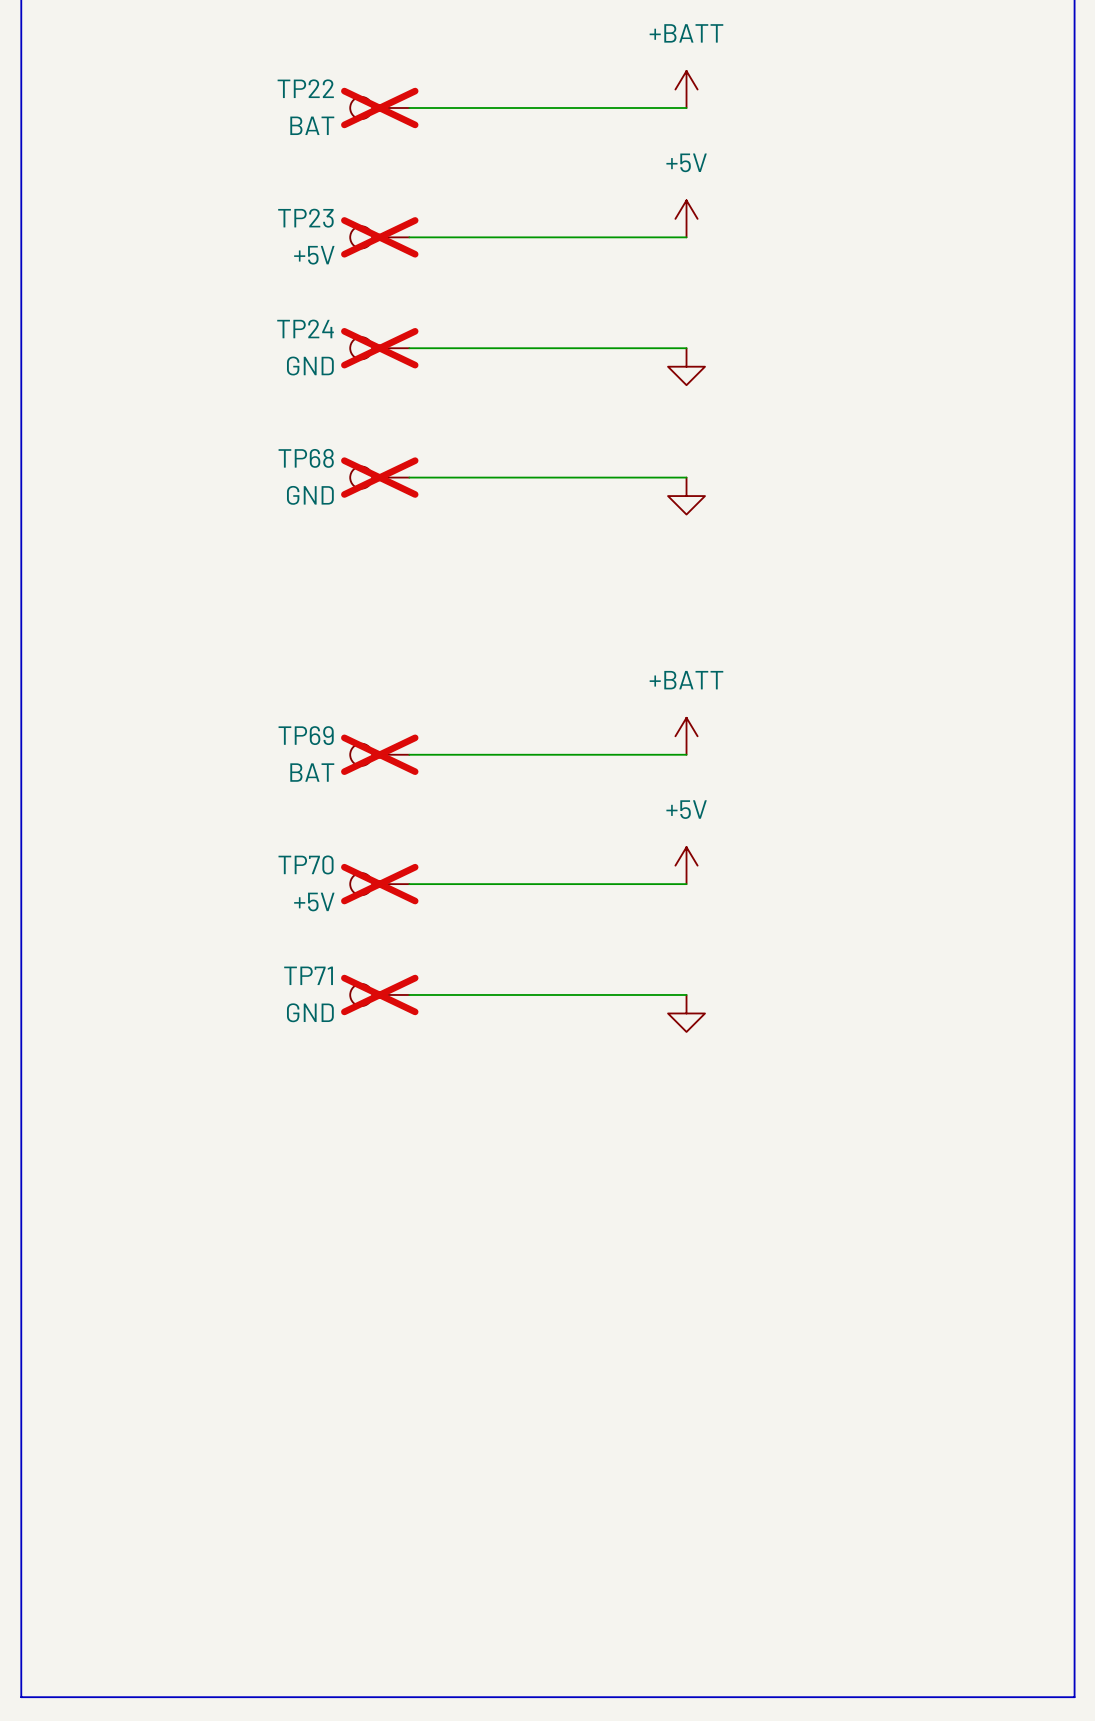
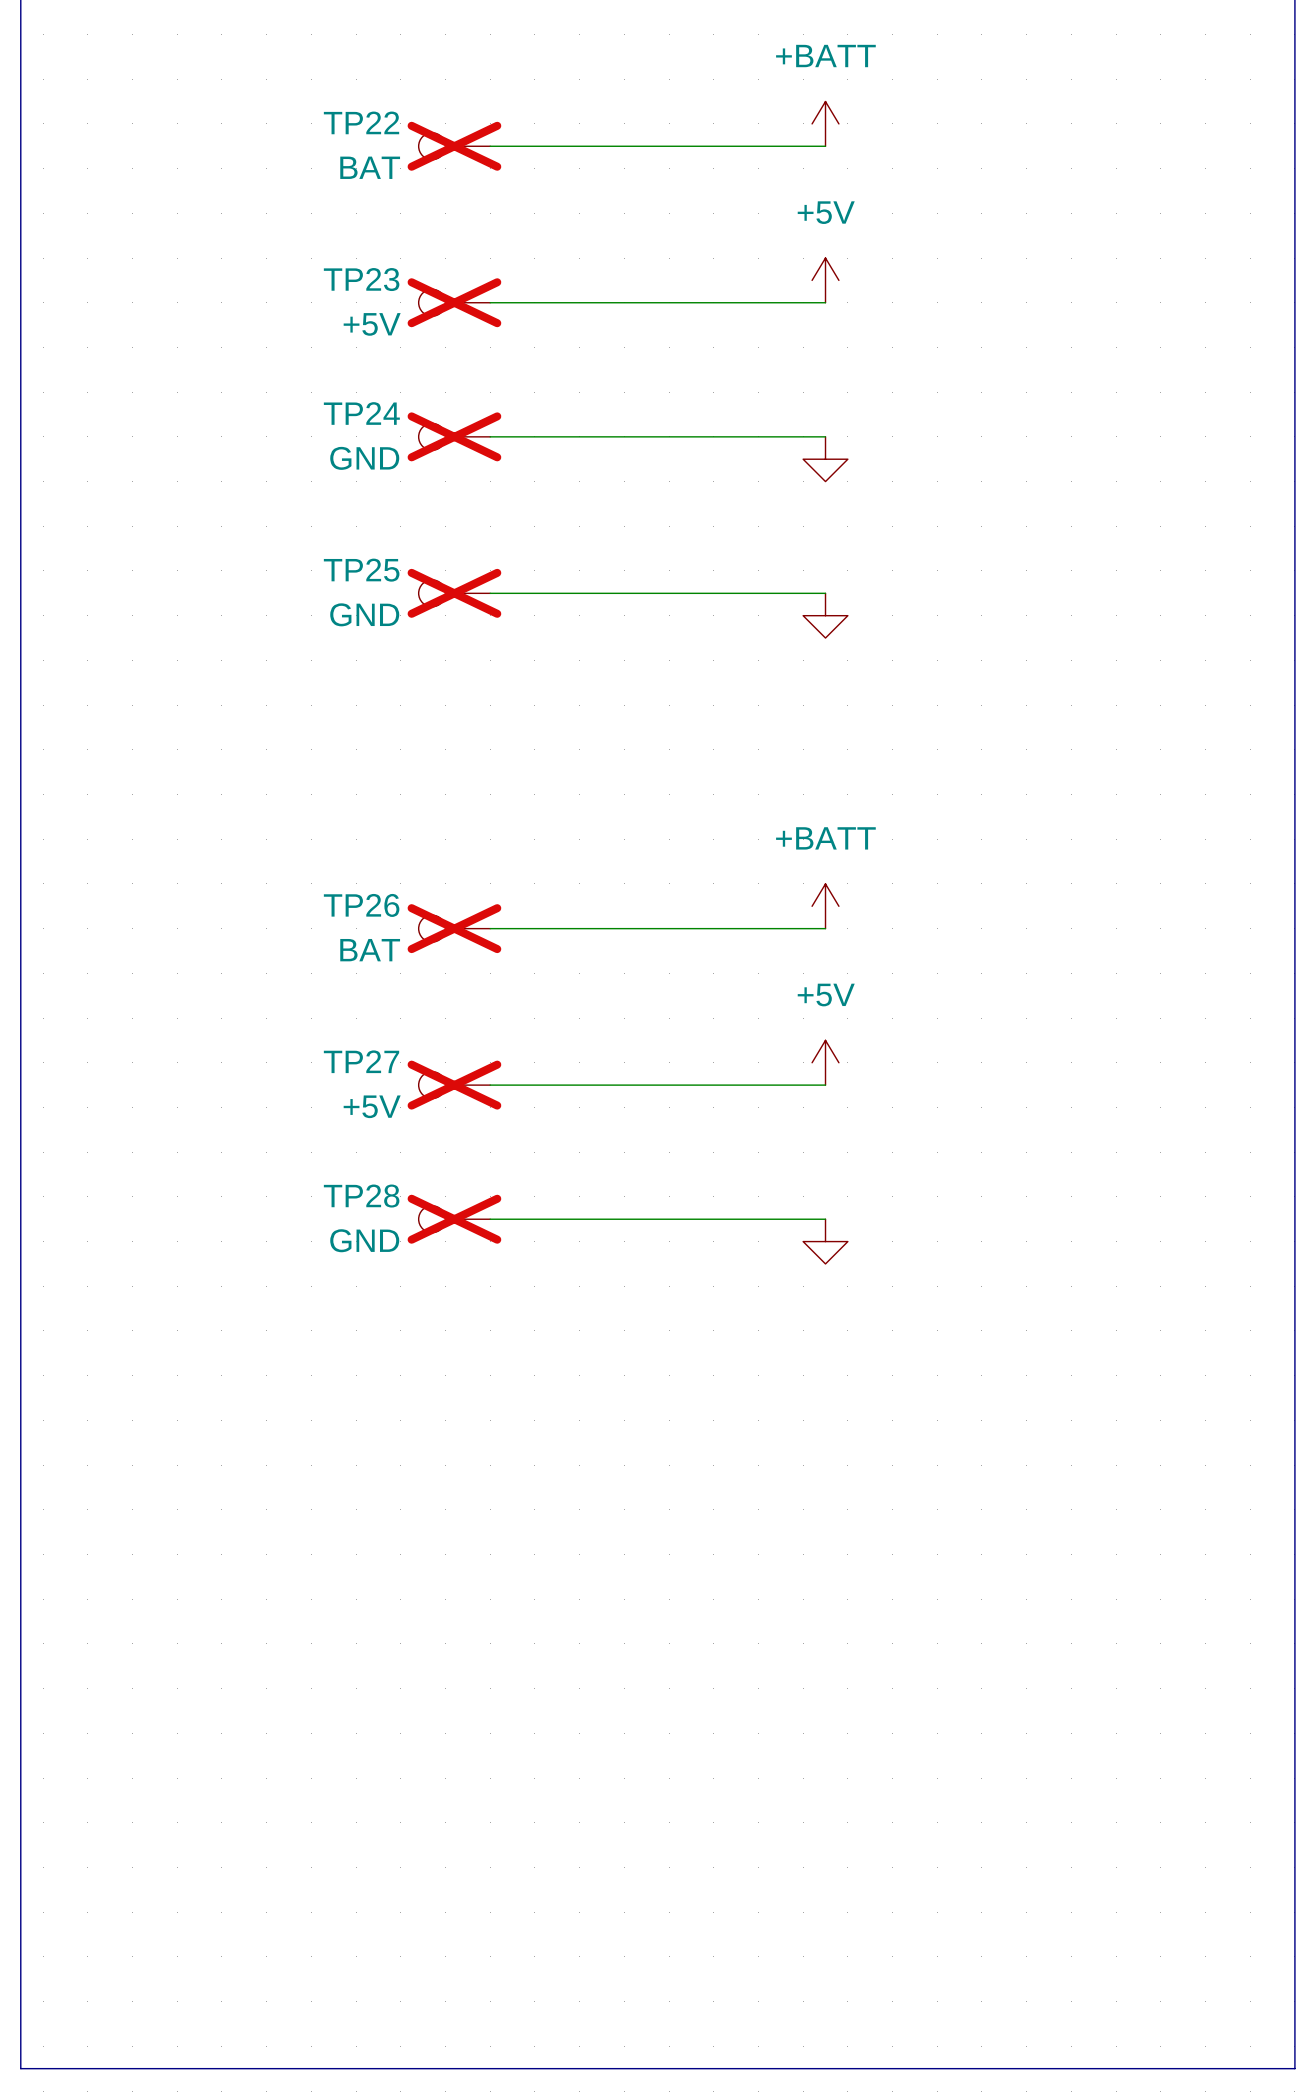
TP68 name: TP68 (306, 458) -> TP25 (361, 570)
TP69 name: TP69 (306, 735) -> TP26 (361, 905)
TP70 name: TP70 (306, 864) -> TP27 (361, 1061)
TP71 name: TP71 (308, 975) -> TP28 (361, 1196)

